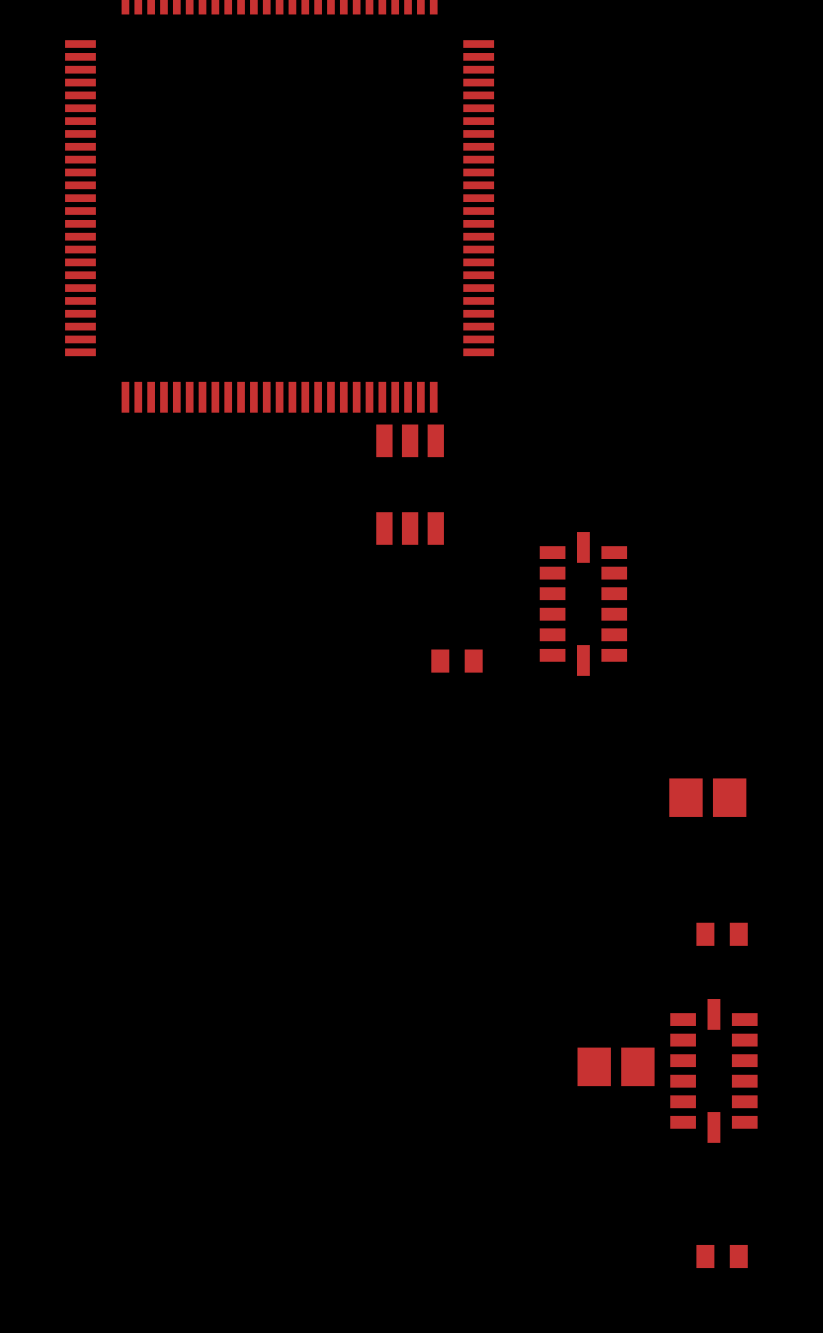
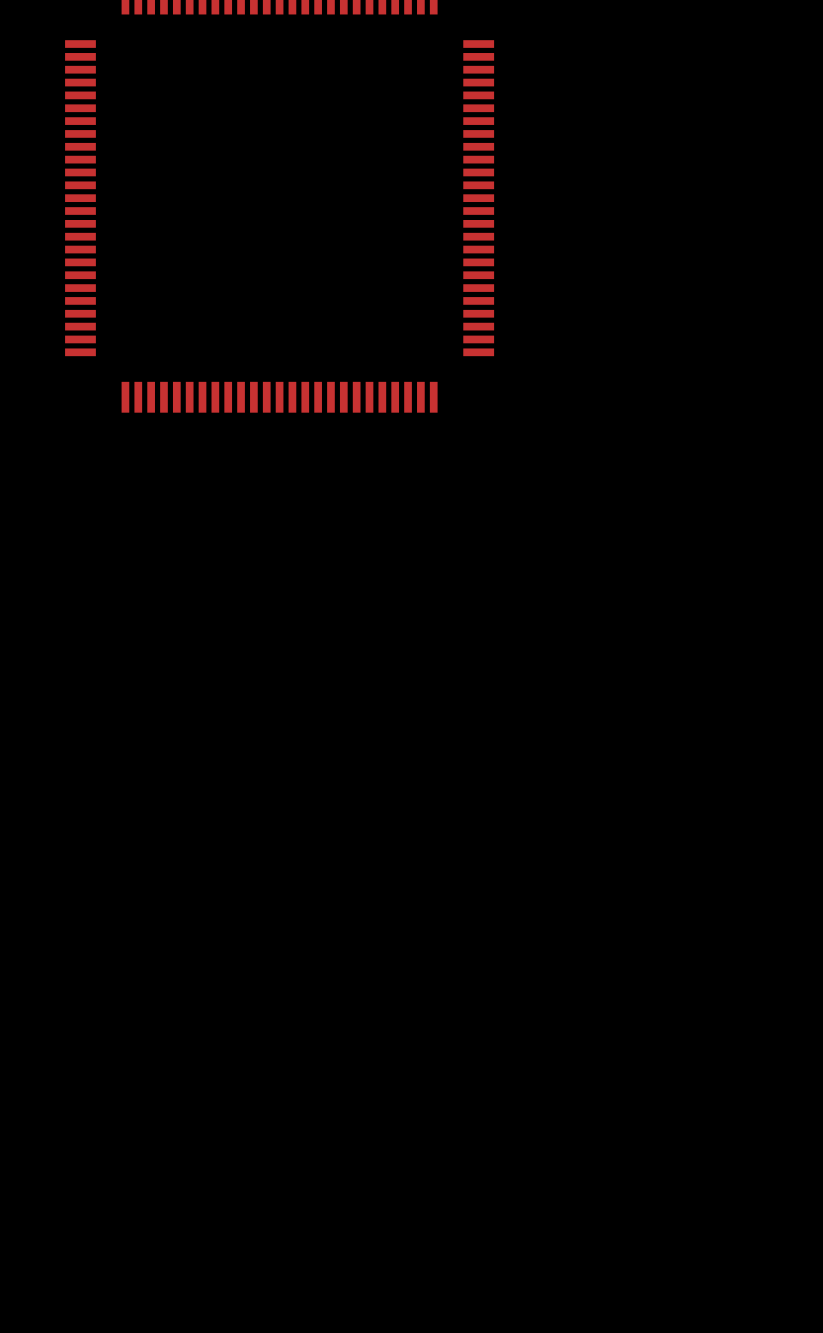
part: (410, 440) -> none
part: (410, 528) -> none
part: (583, 603) -> none
part: (456, 661) -> none
part: (707, 797) -> none
part: (722, 934) -> none
part: (616, 1066) -> none
part: (713, 1070) -> none
part: (722, 1256) -> none

